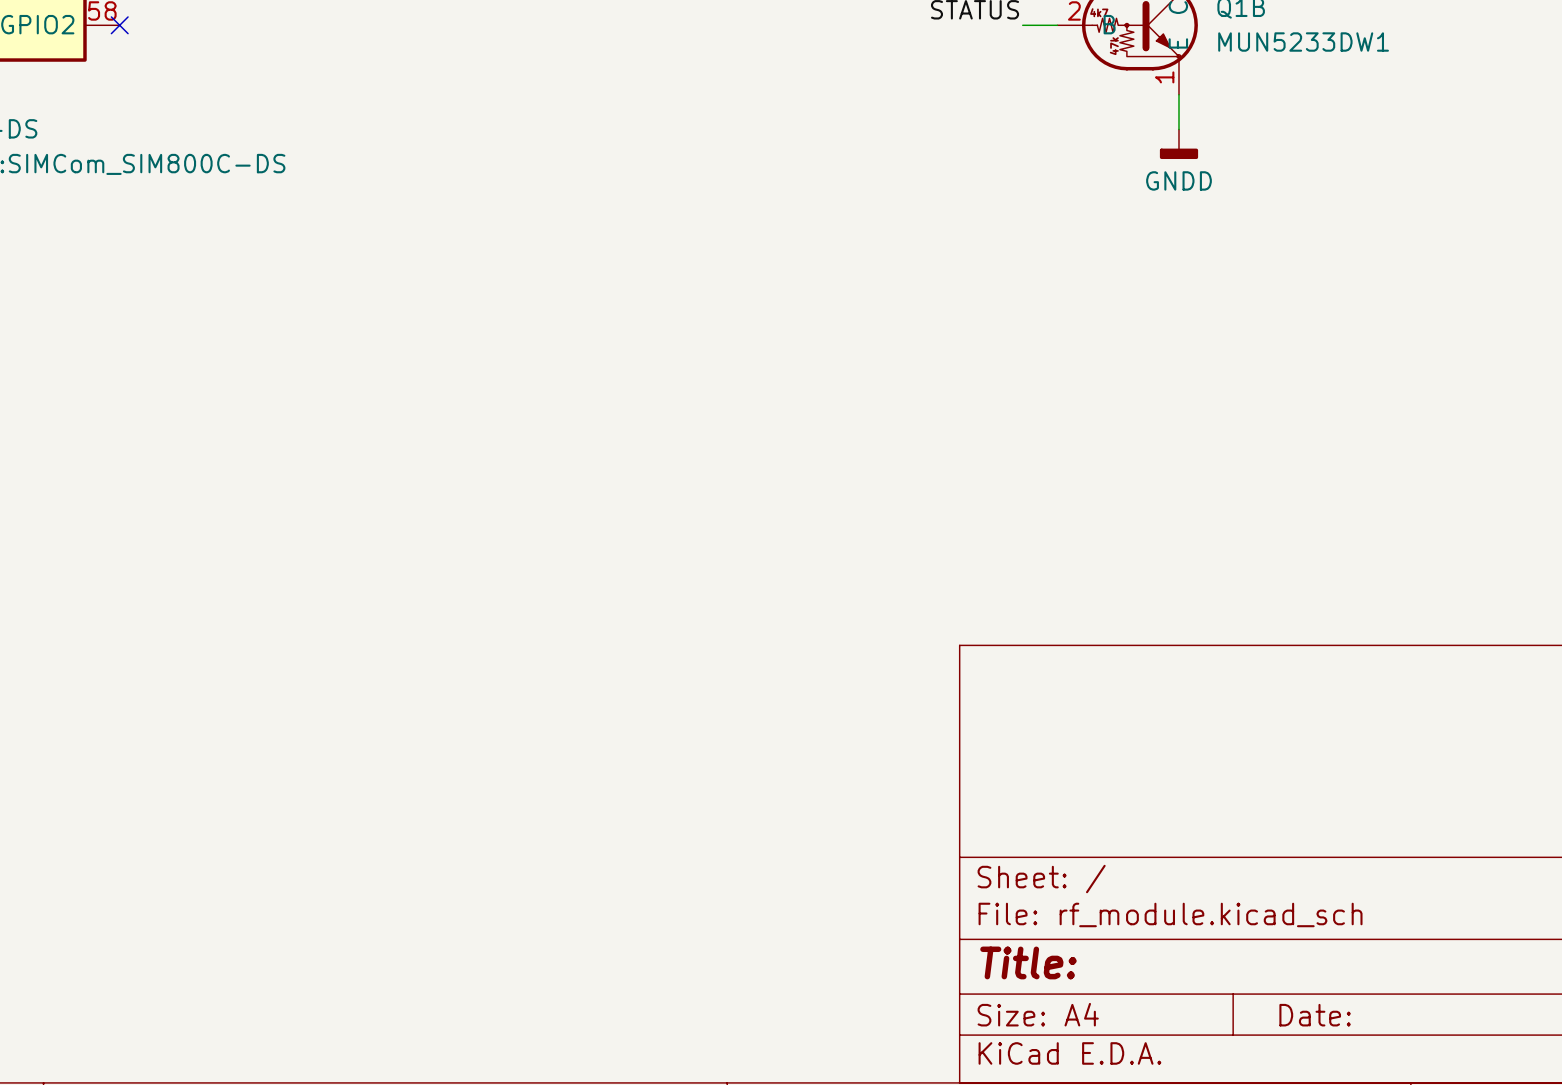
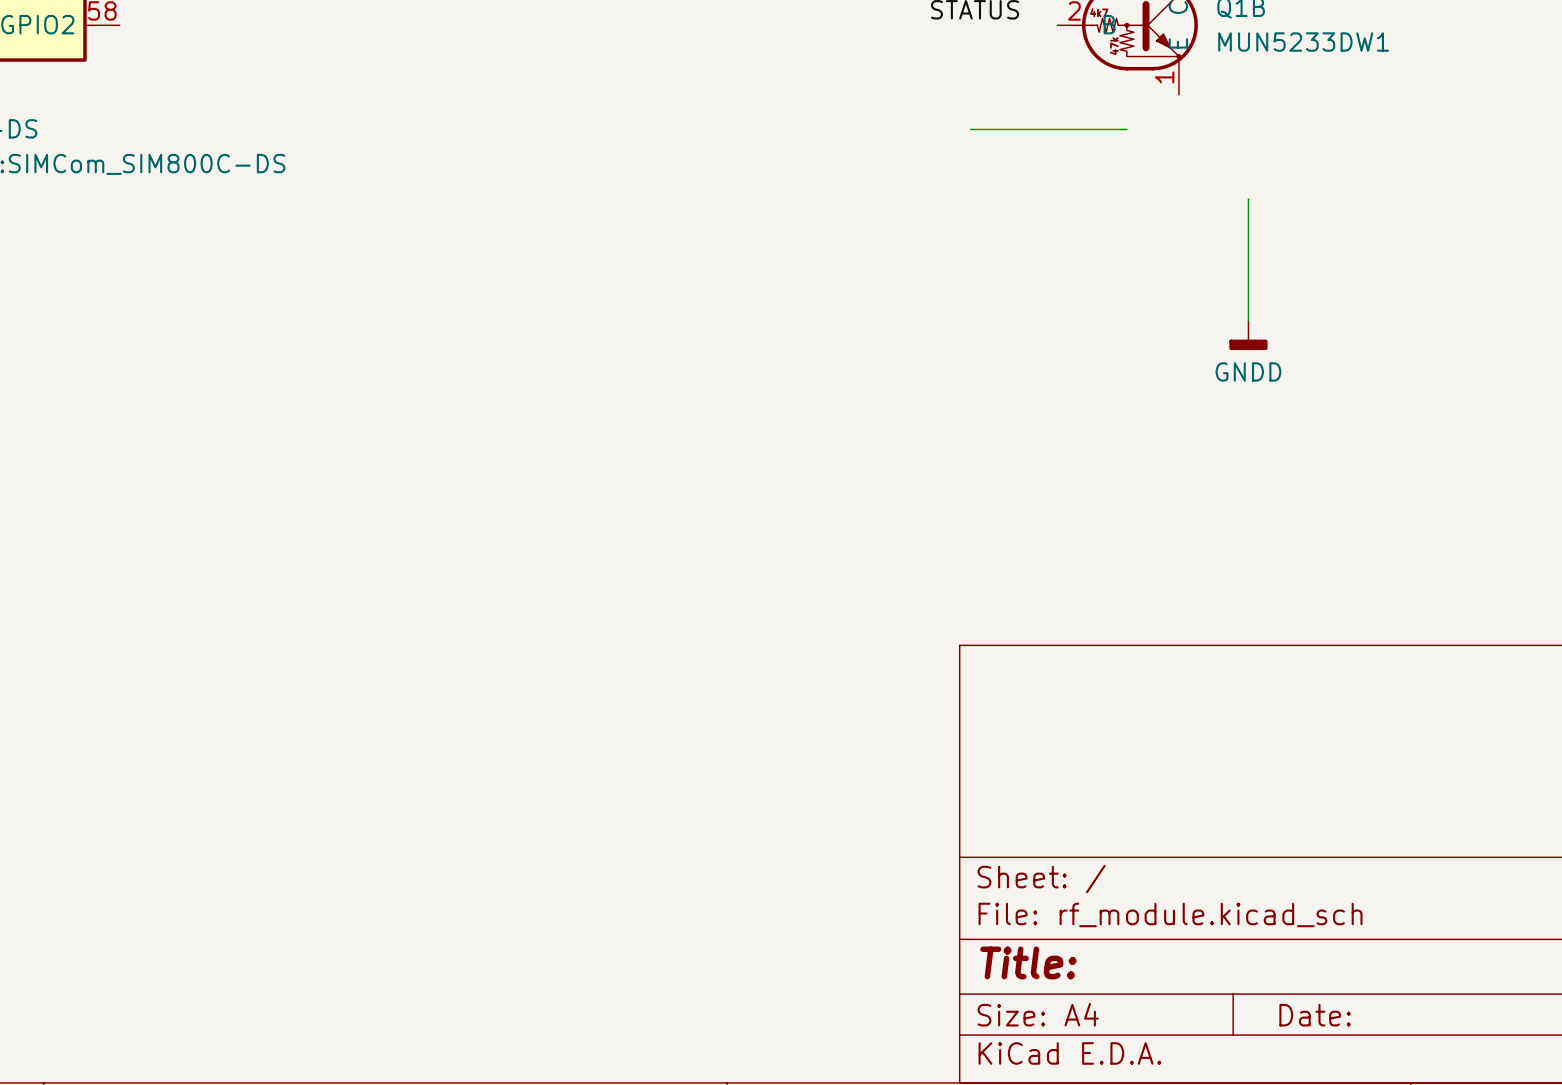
no-connect mark: (119, 25) -> none
wire: (1022, 25) (1057, 25) -> none
wire: (1178, 94) (1178, 129) -> none
wire: none -> (970, 129) (1126, 129)
power symbol position: GNDD (1178, 144) -> GNDD (1248, 335)
wire: none -> (1248, 198) (1248, 320)

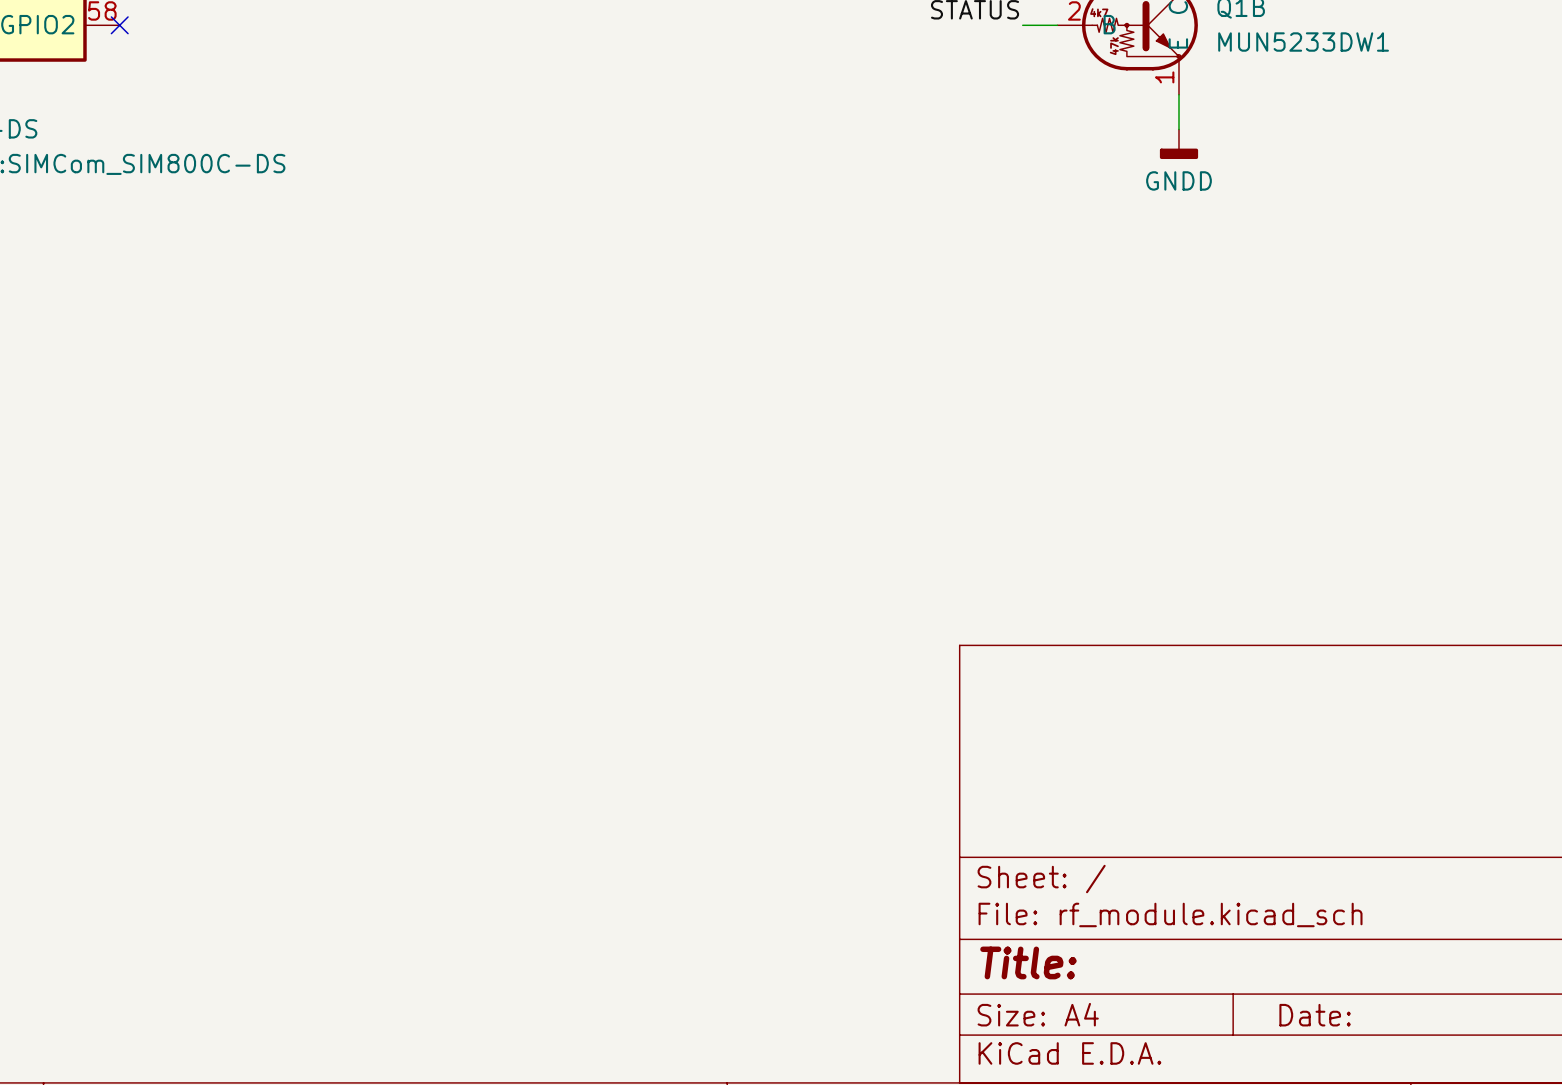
no-connect mark: none -> (119, 25)
wire: none -> (1022, 25) (1057, 25)
wire: none -> (1178, 94) (1178, 129)
wire: (970, 129) (1126, 129) -> none
wire: (1248, 198) (1248, 320) -> none
power symbol position: GNDD (1248, 335) -> GNDD (1178, 144)

